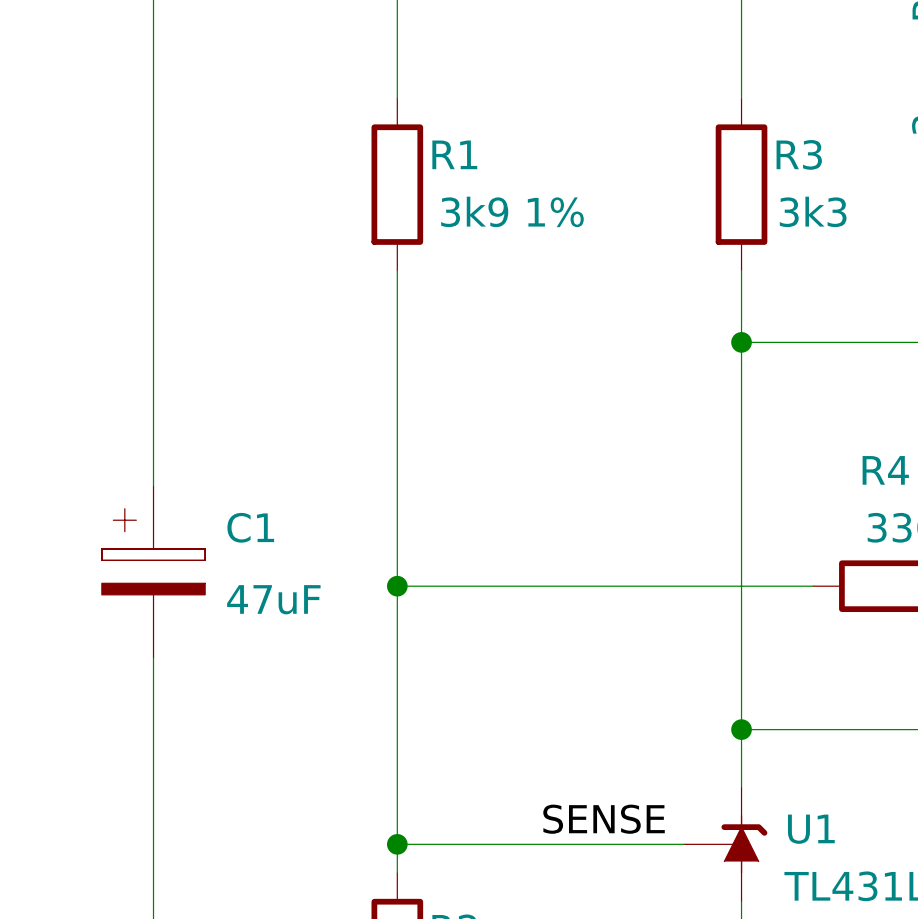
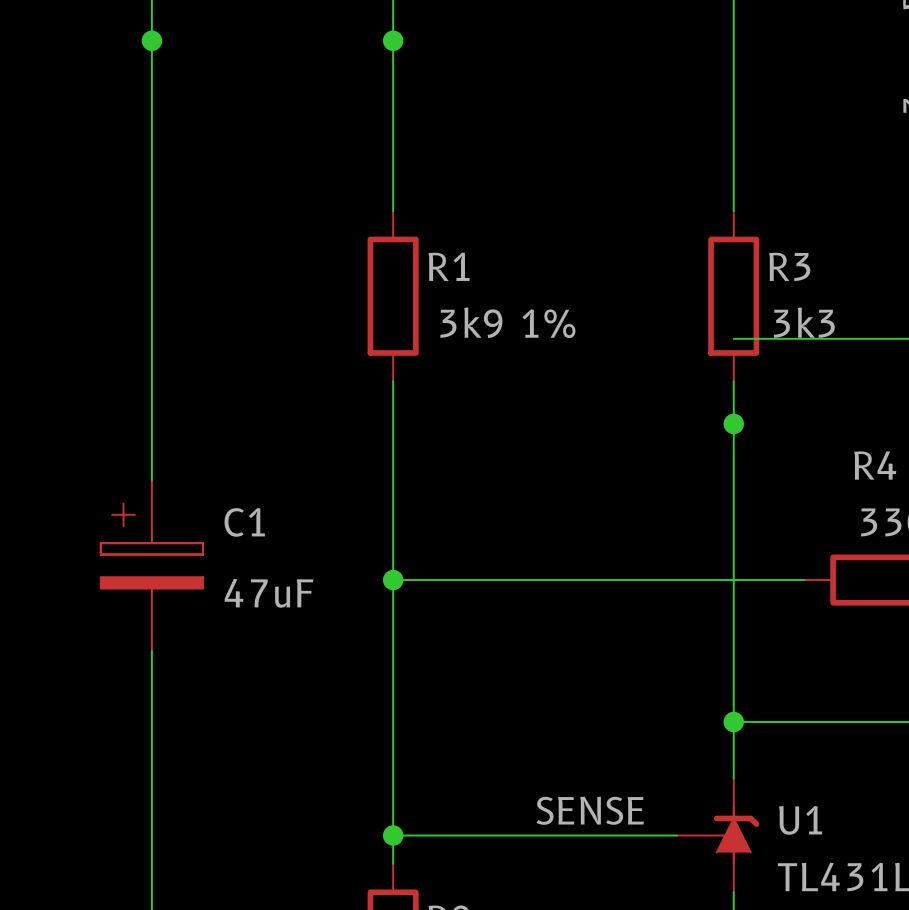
junction: none -> (151, 40)
junction: none -> (393, 40)
R1 position: (397, 184) -> (393, 296)
R3 position: (741, 184) -> (733, 296)
wire: (397, 270) (397, 385) -> (393, 97) (393, 211)
wire: (741, 270) (741, 385) -> (733, 97) (733, 211)
junction position: (741, 342) -> (733, 423)

